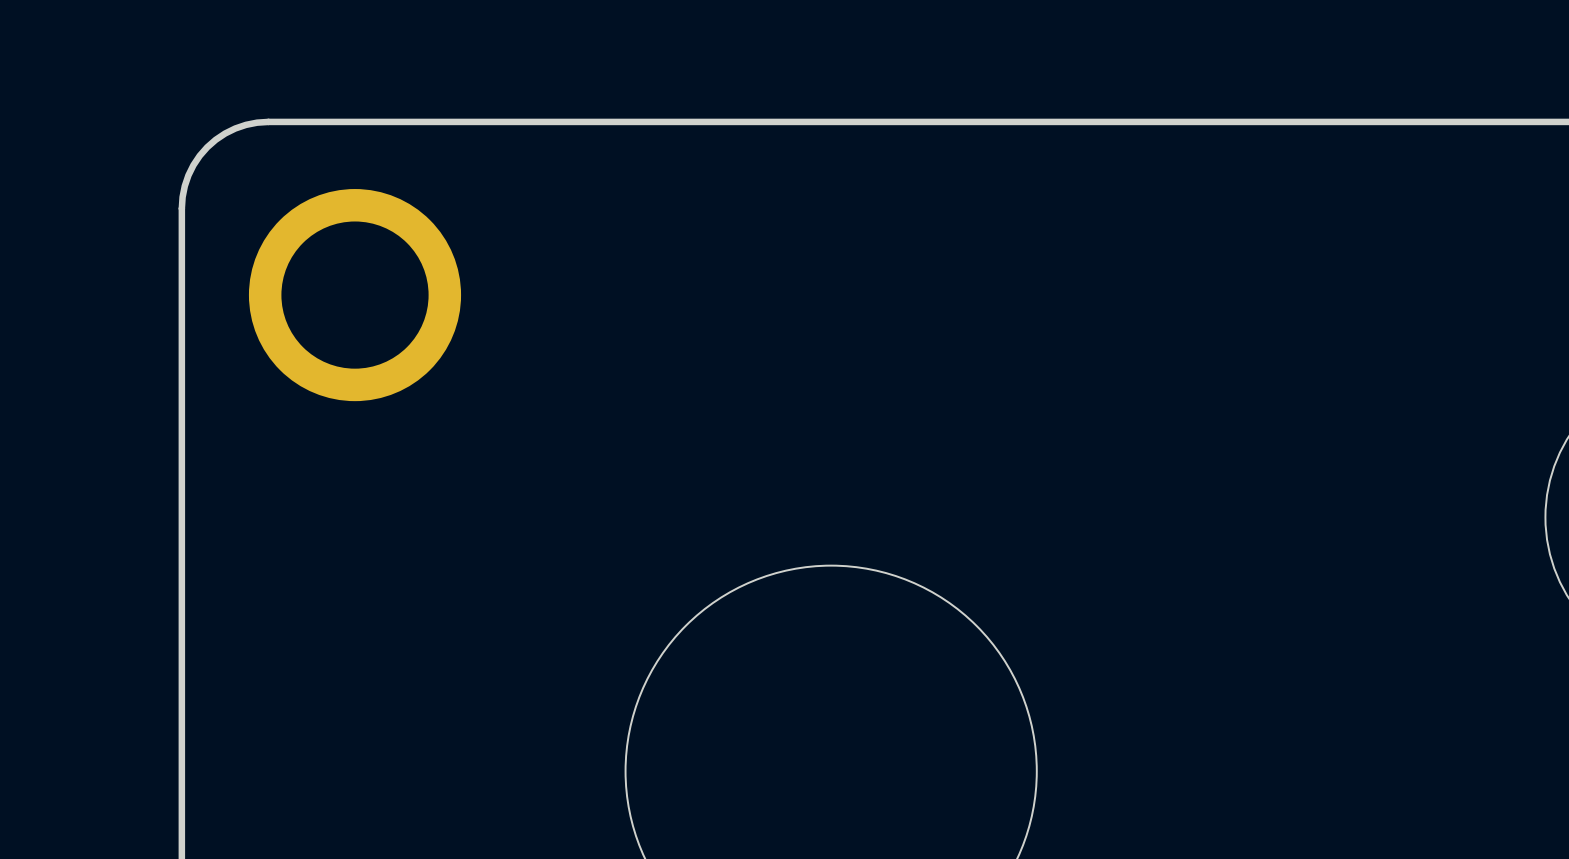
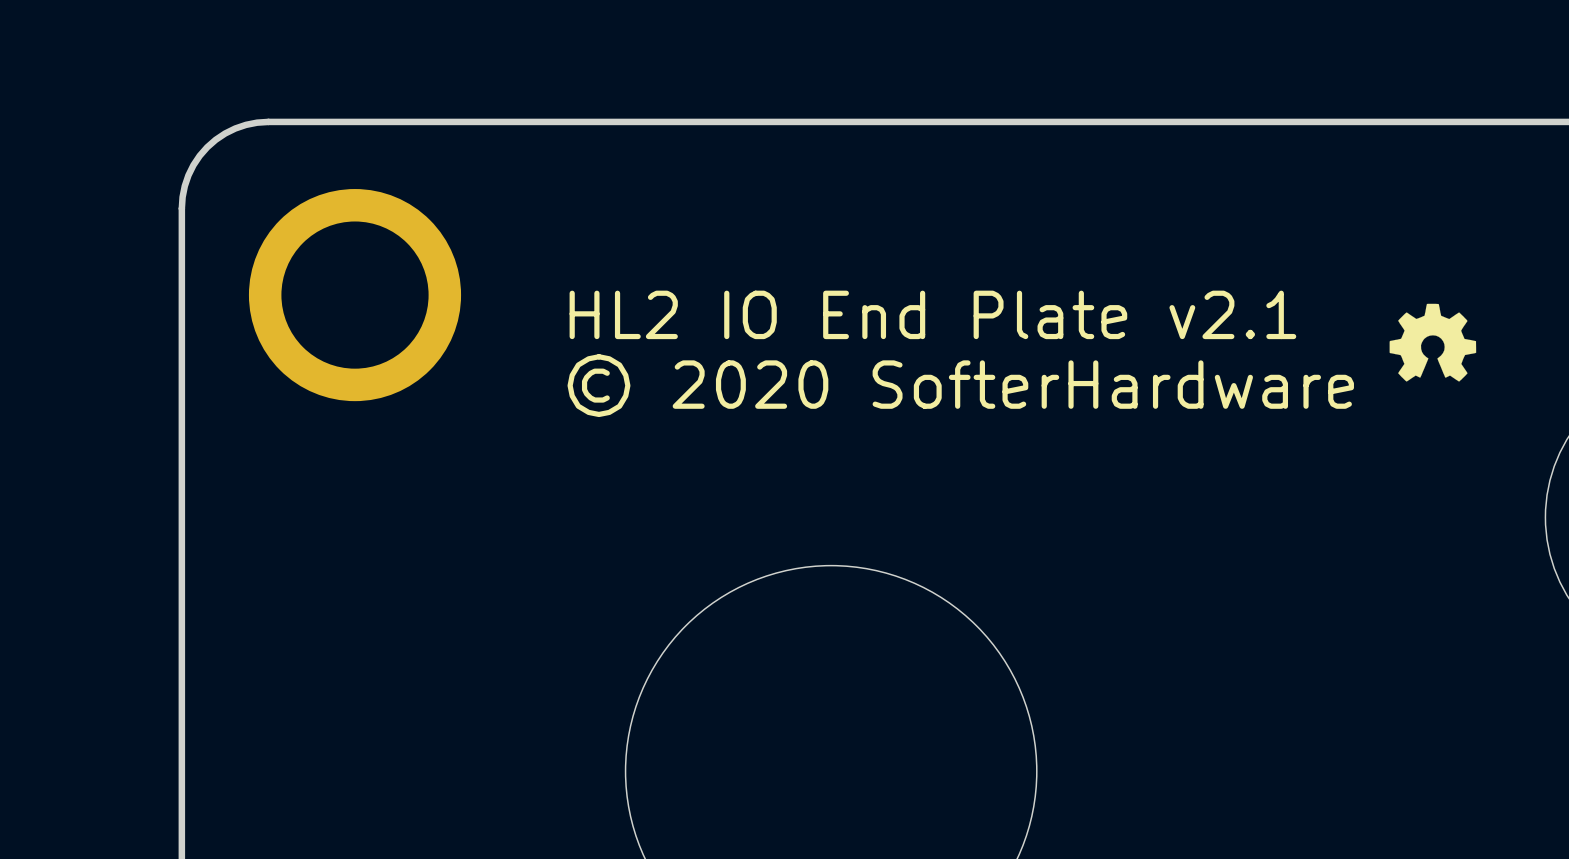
drawing: none -> [1389, 303, 1477, 382]
text: none -> HL2 IO End Plate v2.1 (932, 314)
text: none -> © 2020 SofterHardware (960, 385)

